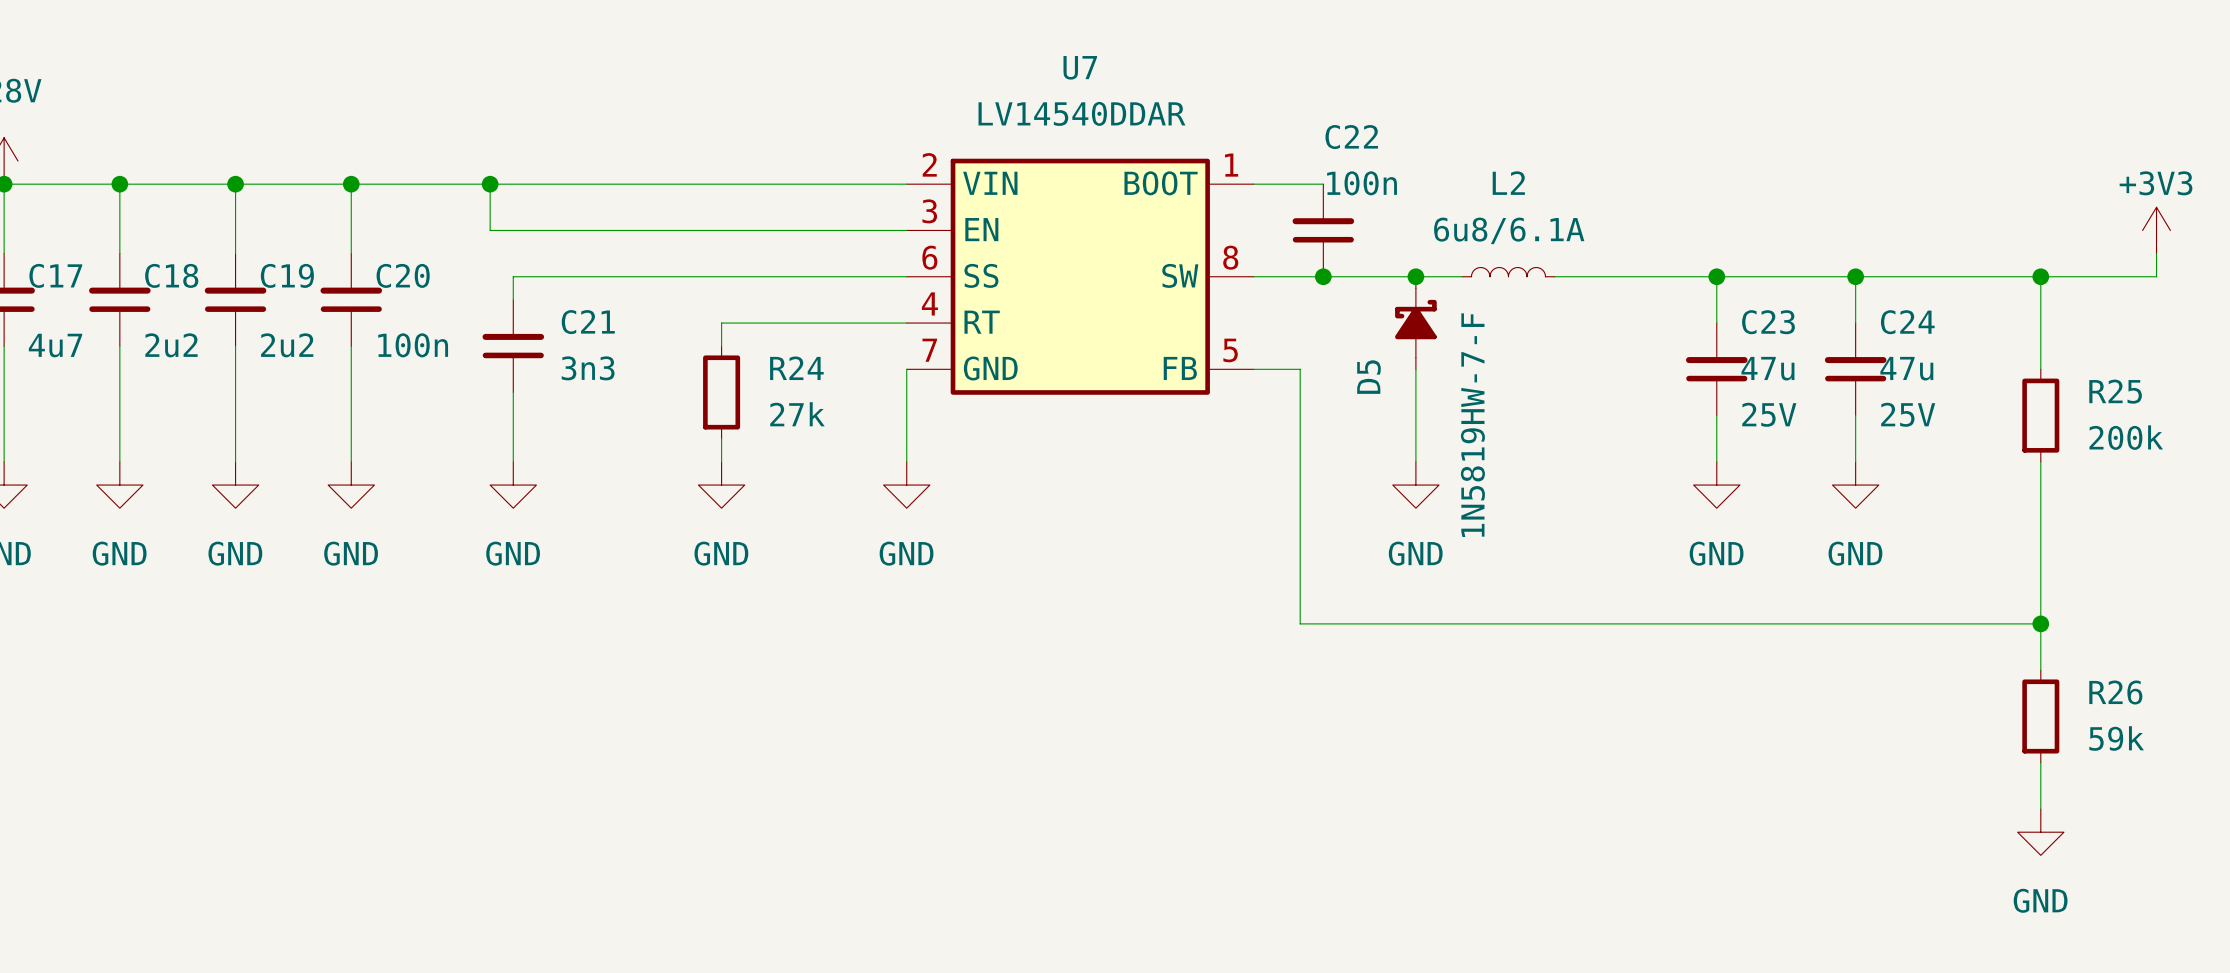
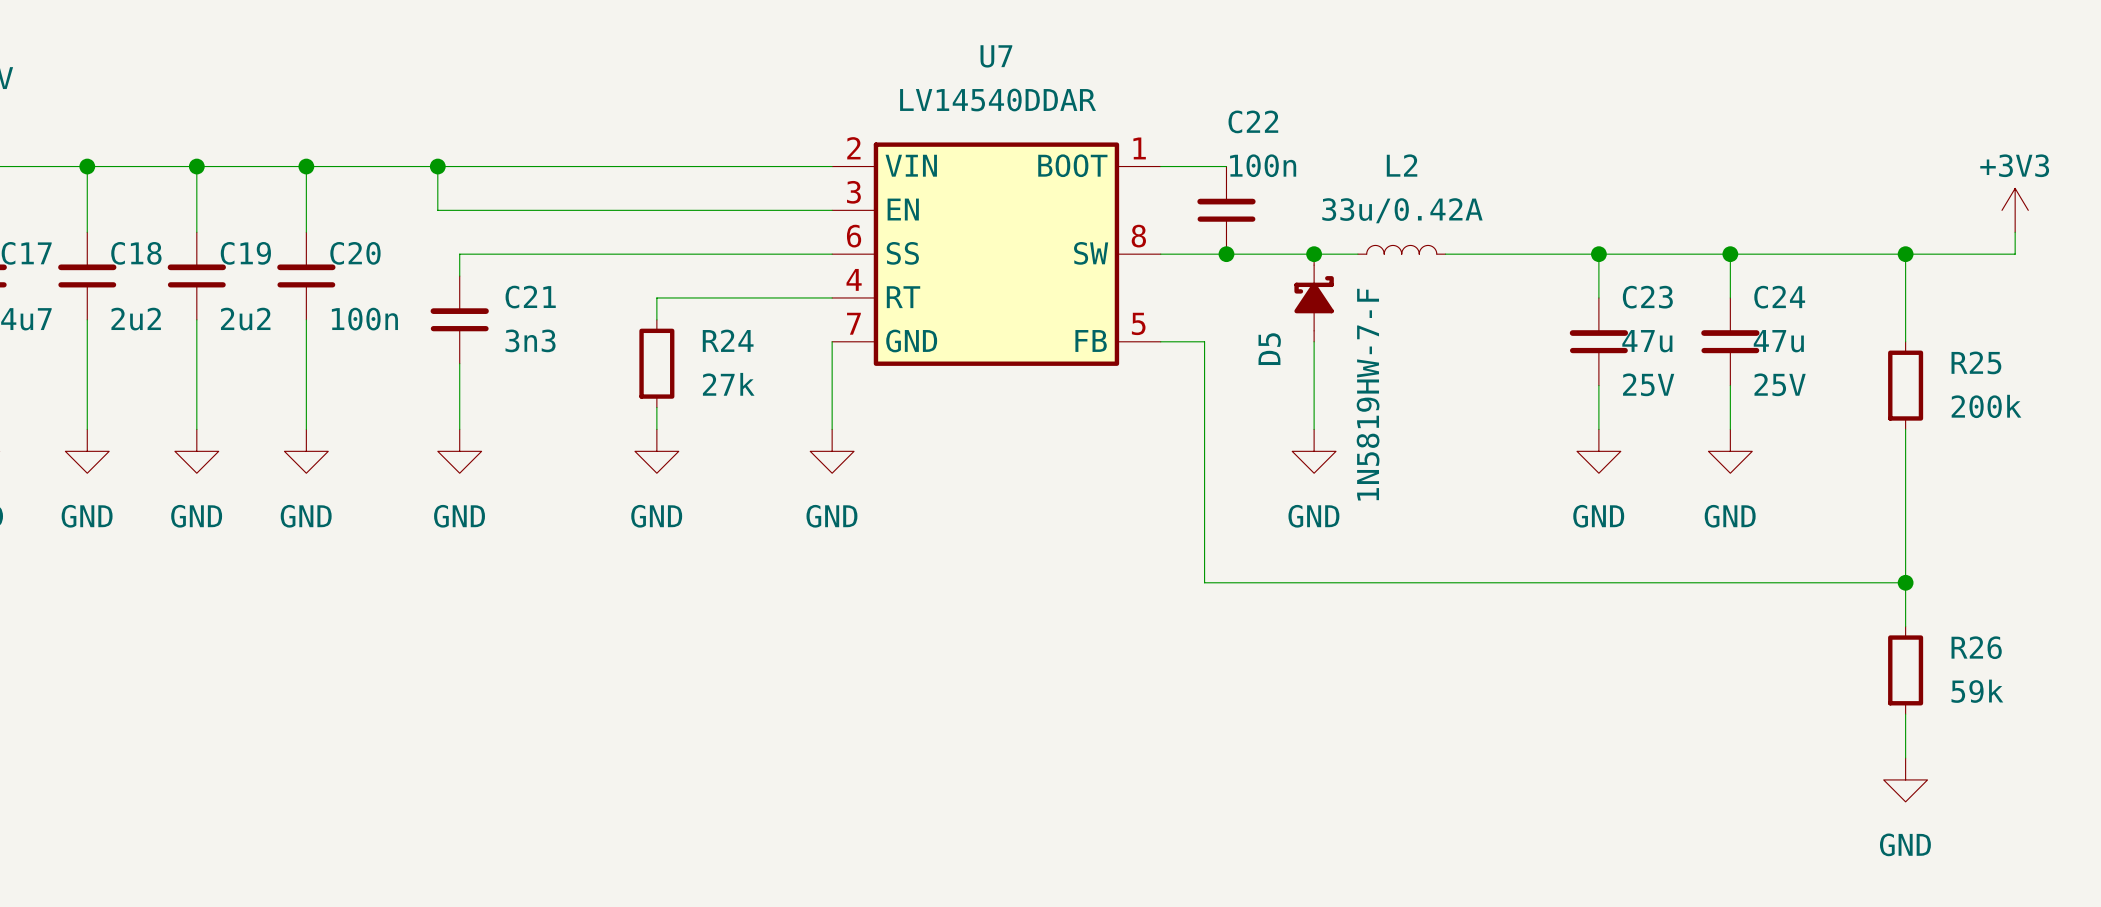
L2 text: 6u8/6.1A (1509, 230) -> 33u/0.42A (1402, 210)

